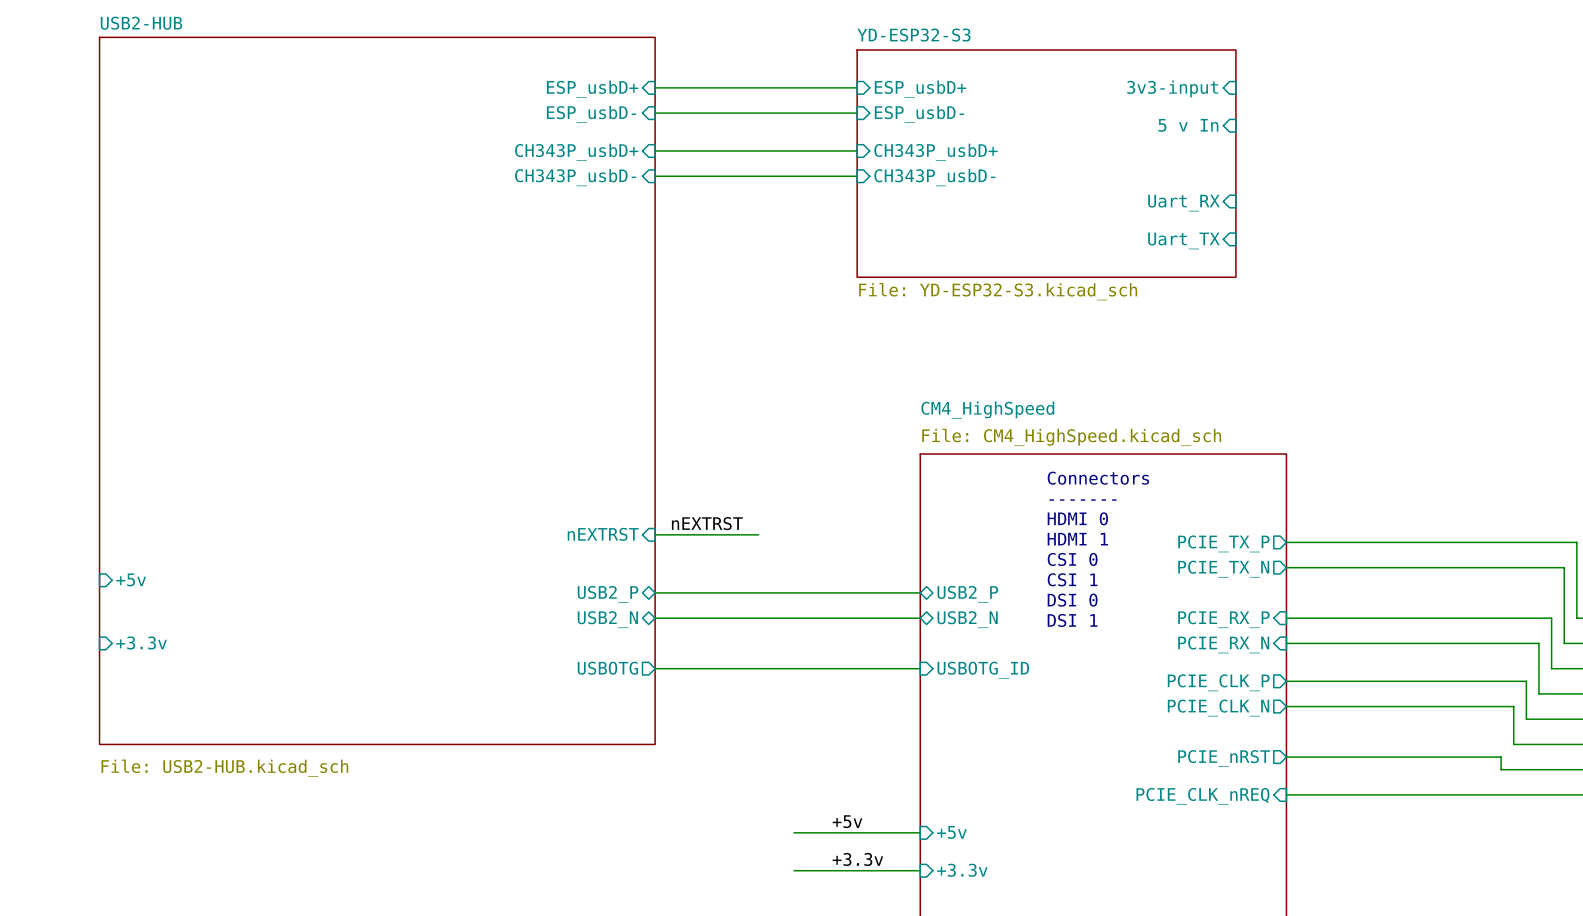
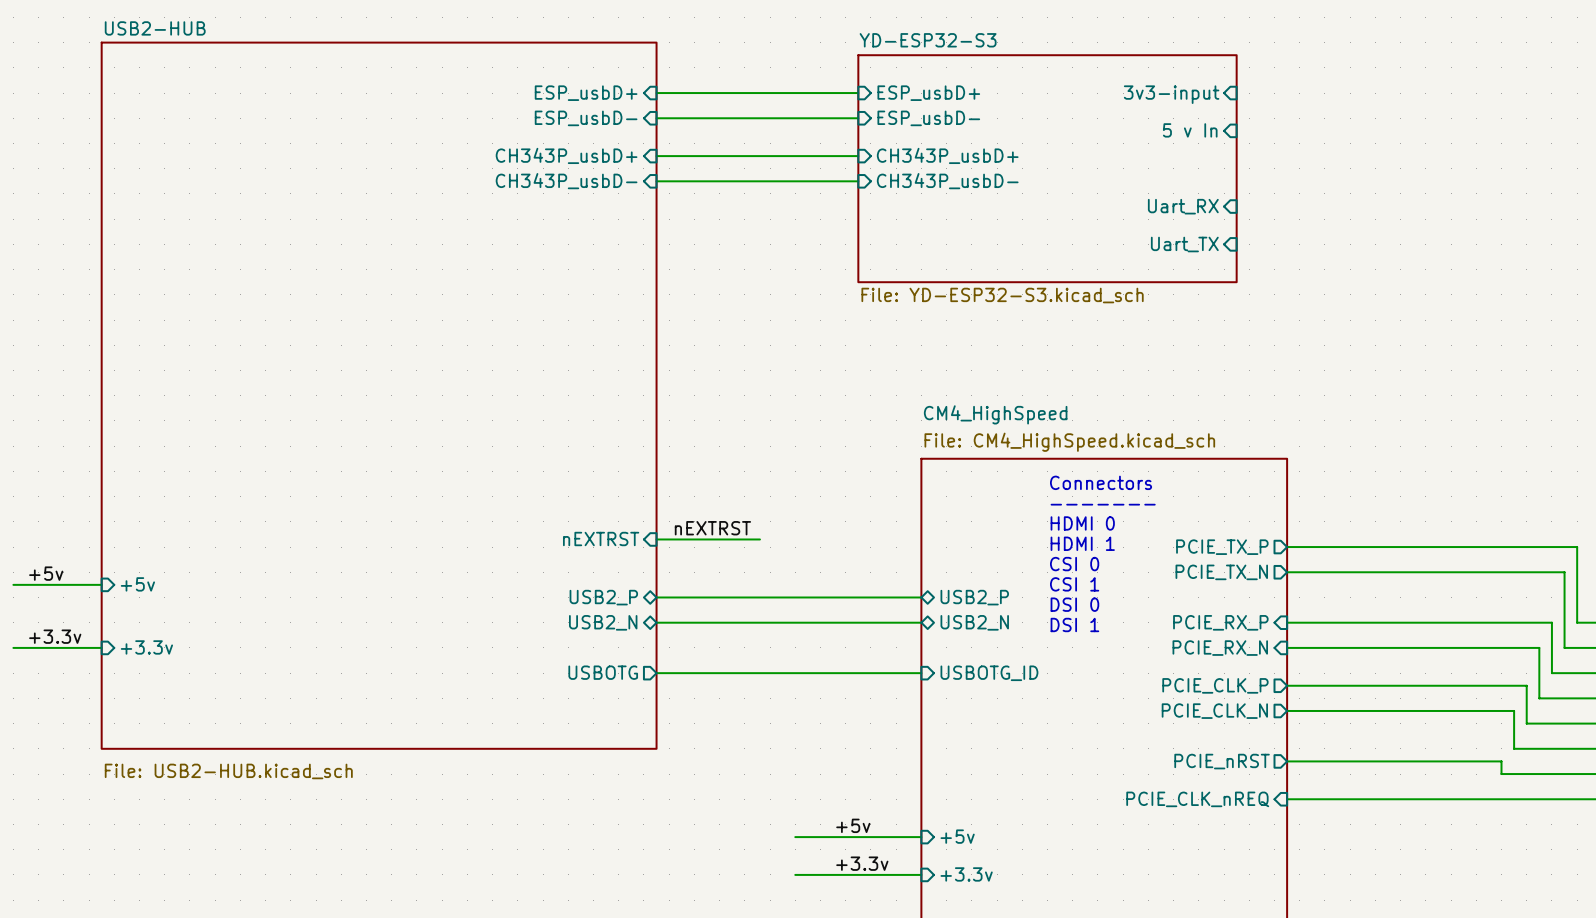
label: none -> +5v (46, 573)
wire: none -> (13, 584) (101, 584)
label: none -> +3.3v (55, 636)
wire: none -> (13, 647) (101, 647)

